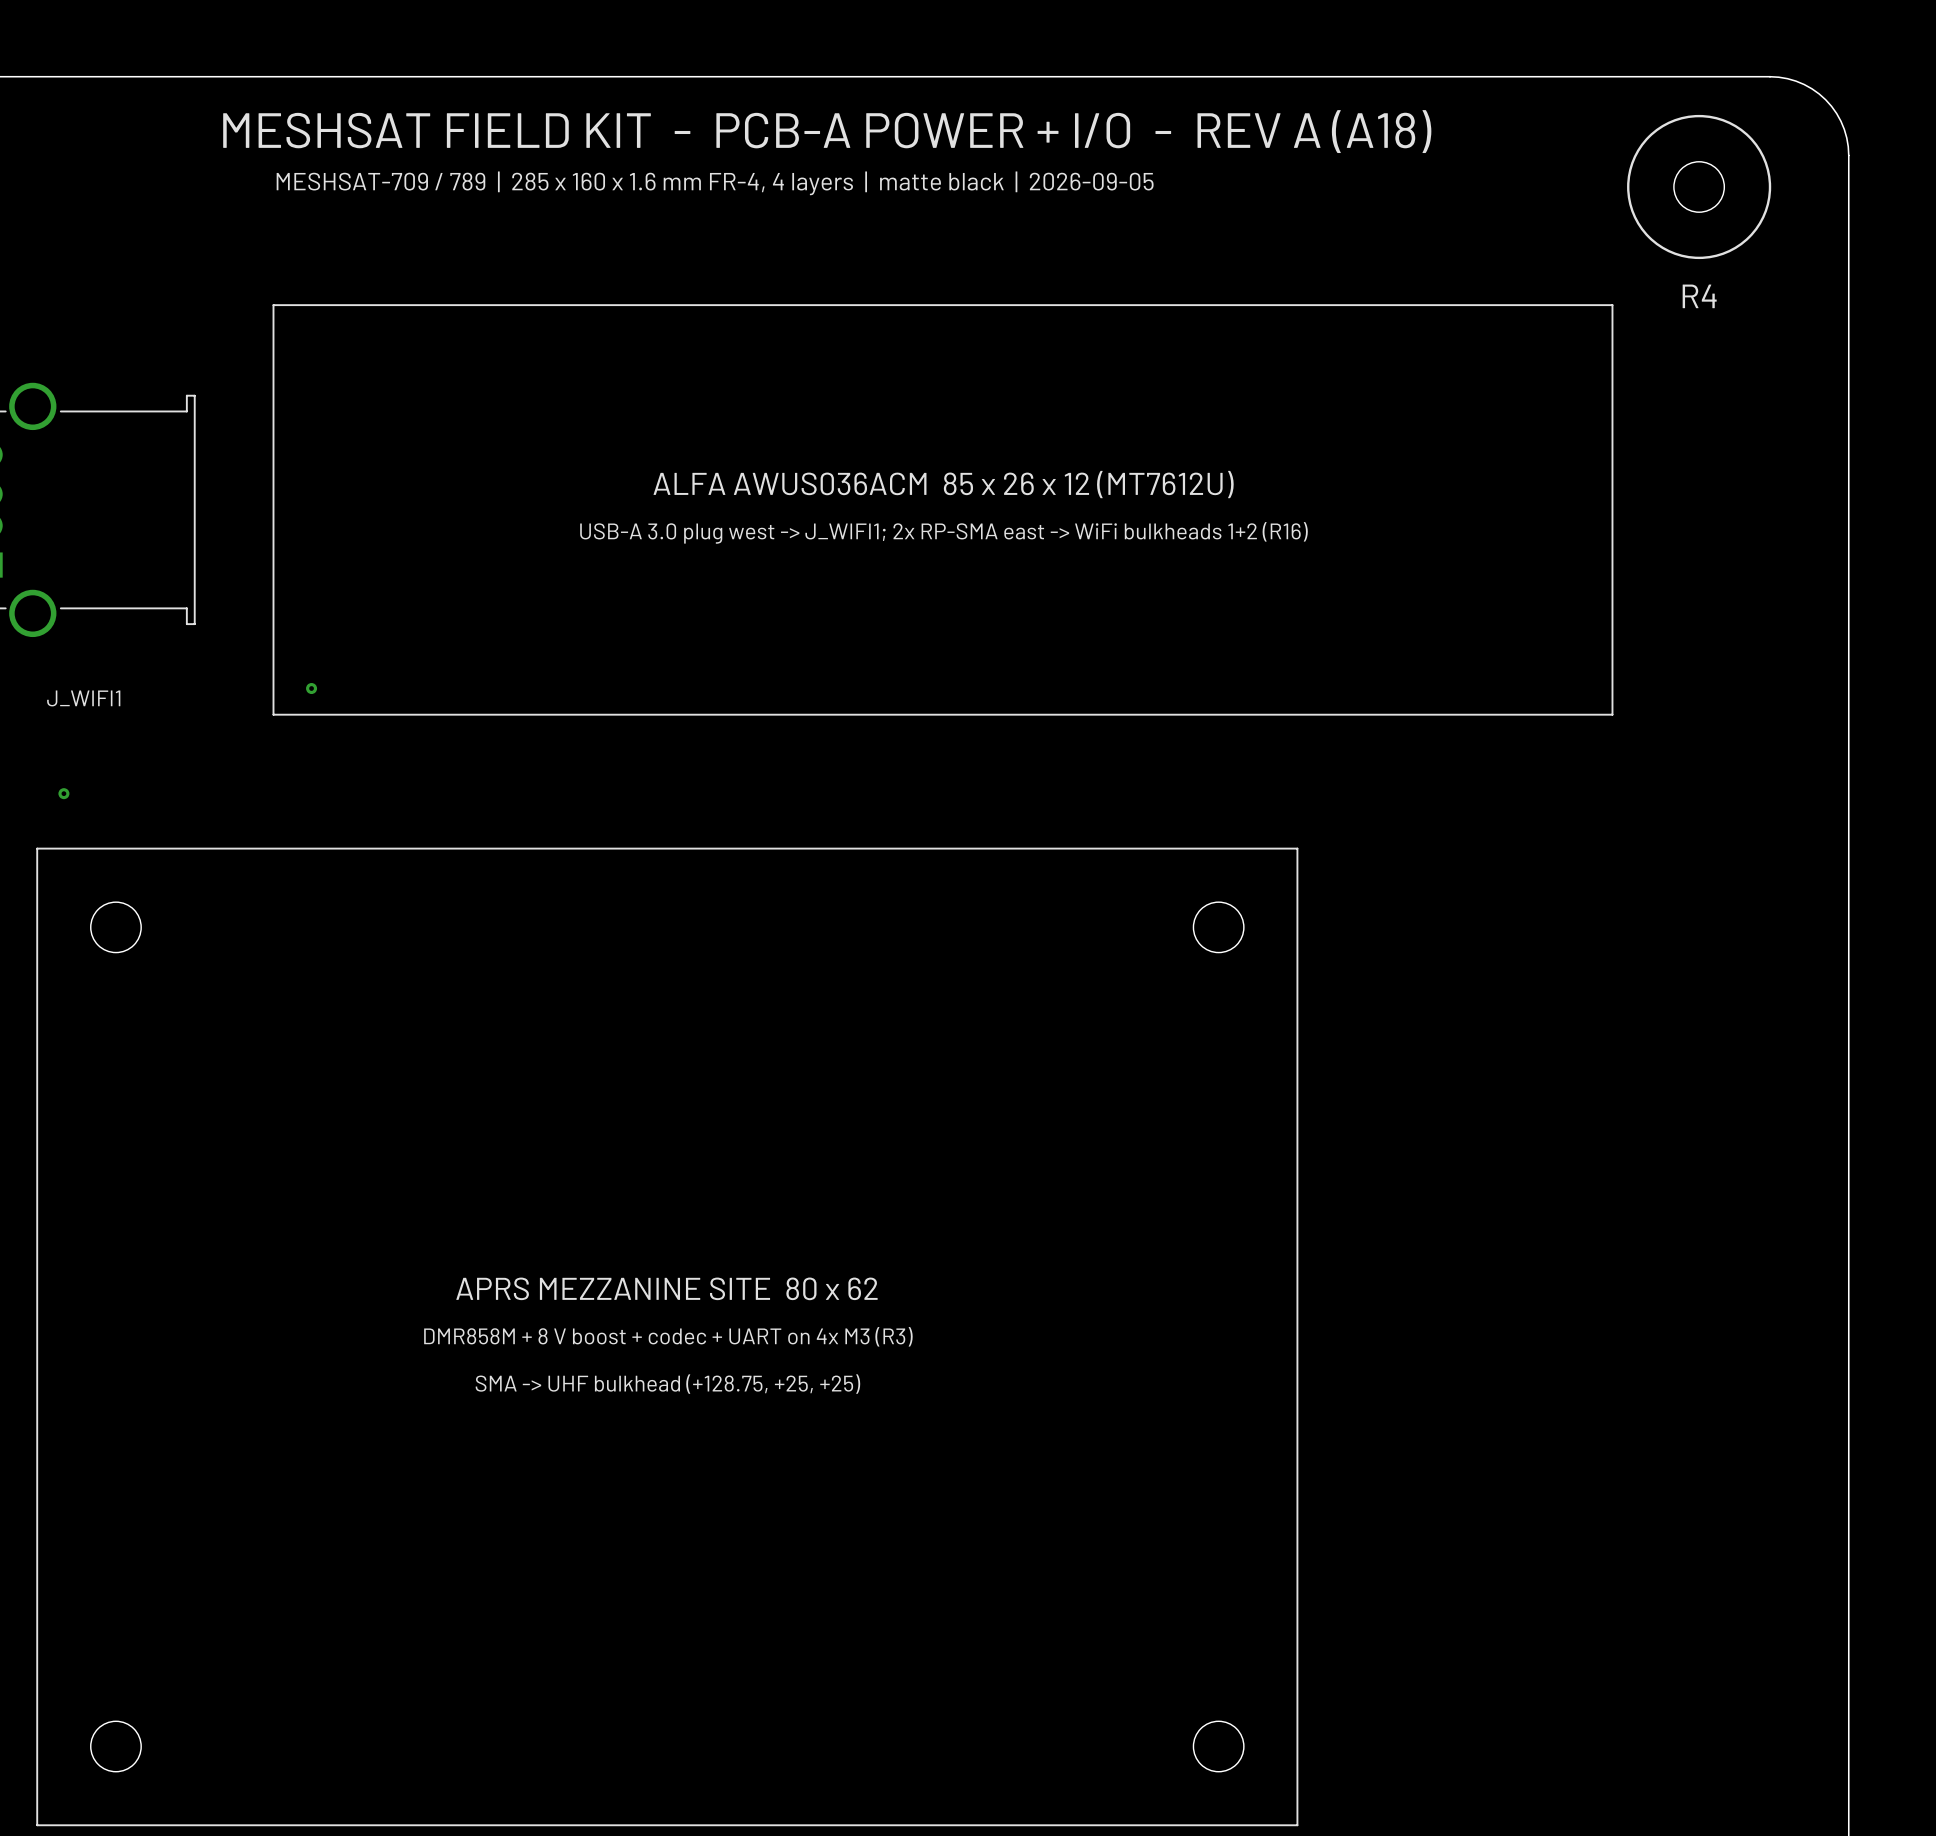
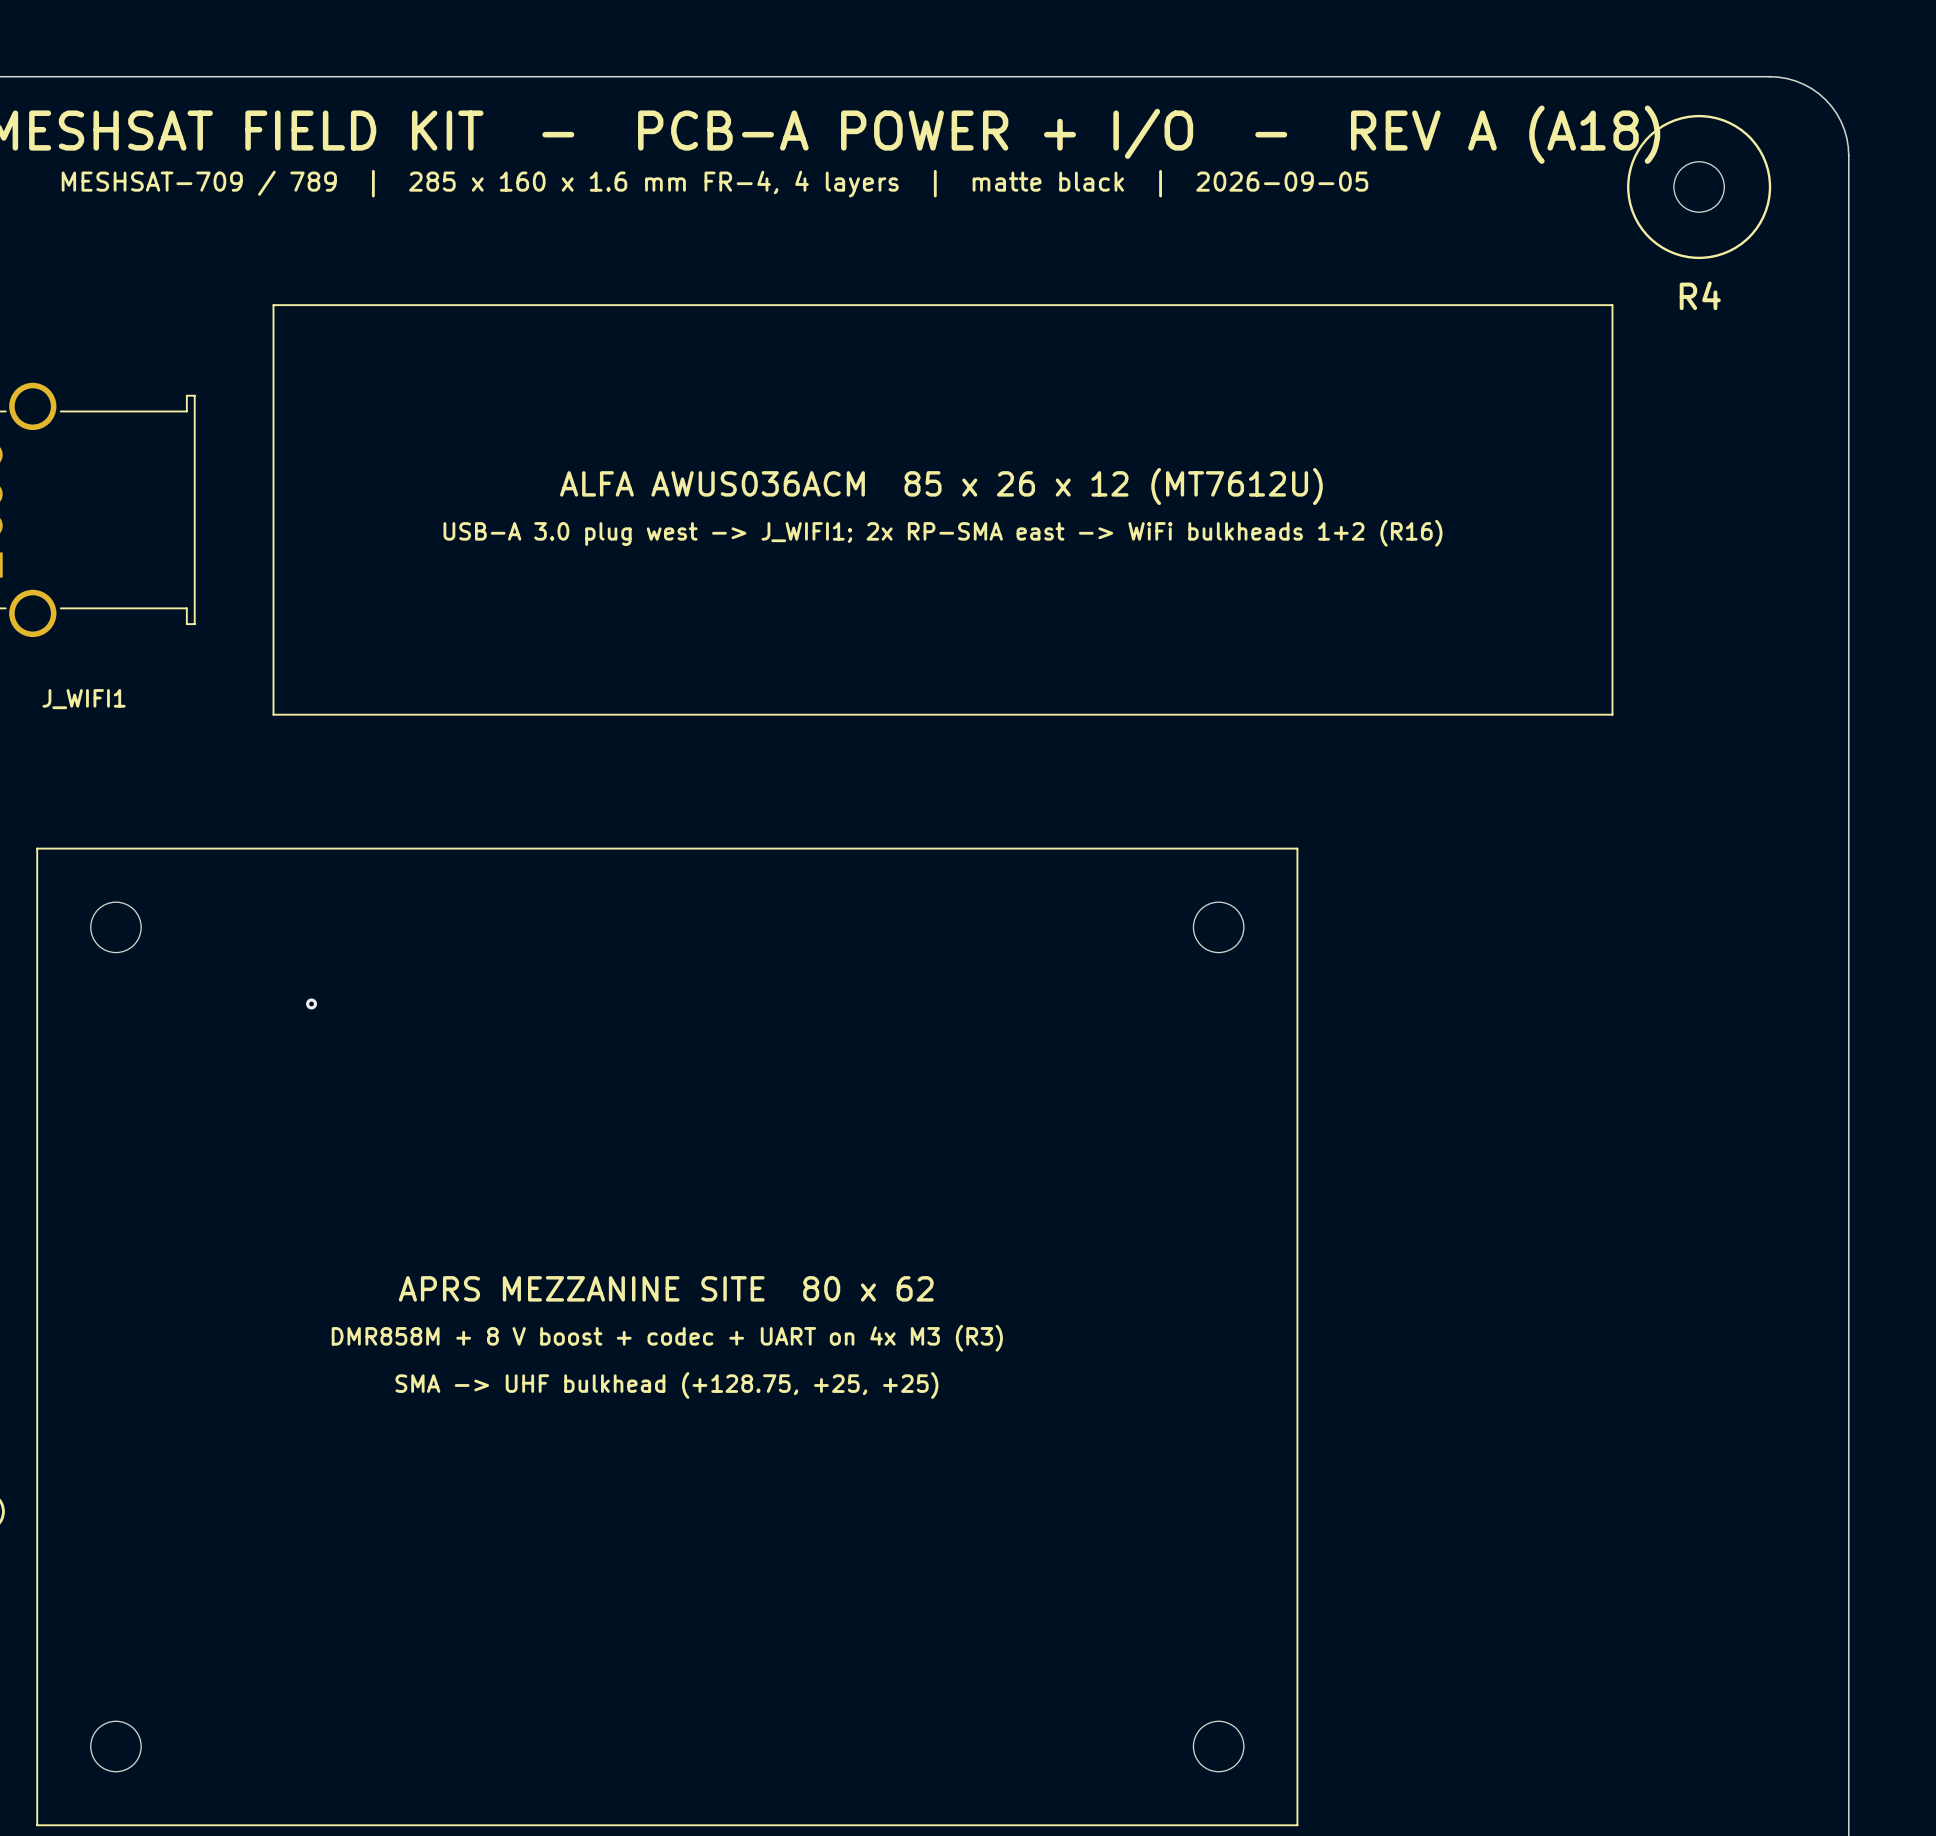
via: (311, 688) -> none
via: (63, 793) -> none
via: none -> (311, 1003)

